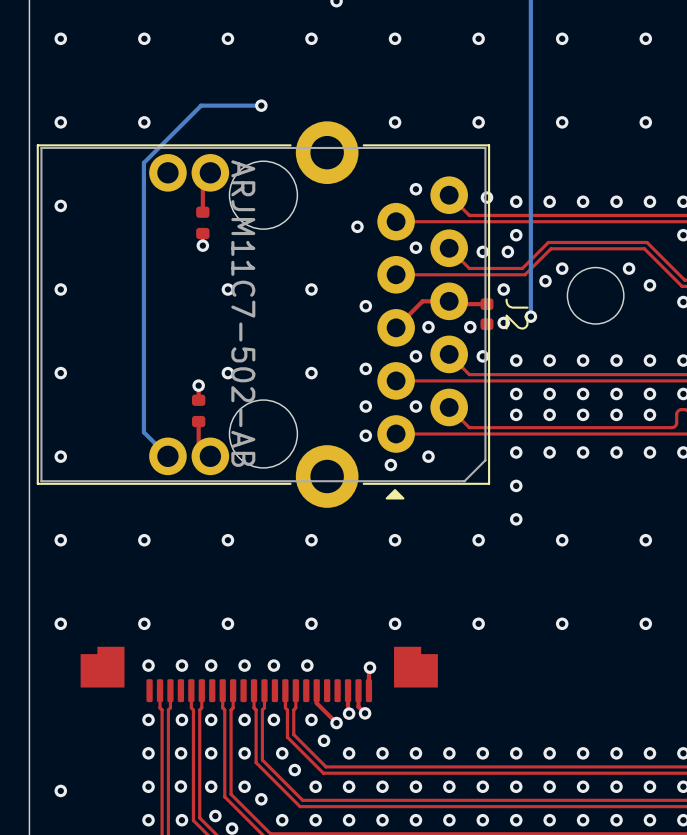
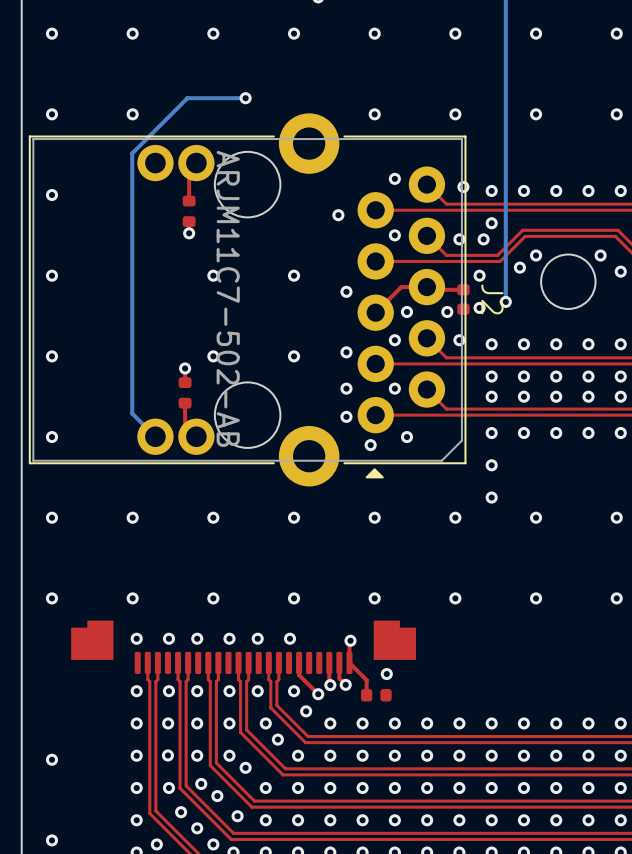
top track: none -> (349, 662) (366, 680) (366, 695)
via: none -> (386, 674)
part: none -> (376, 695)

